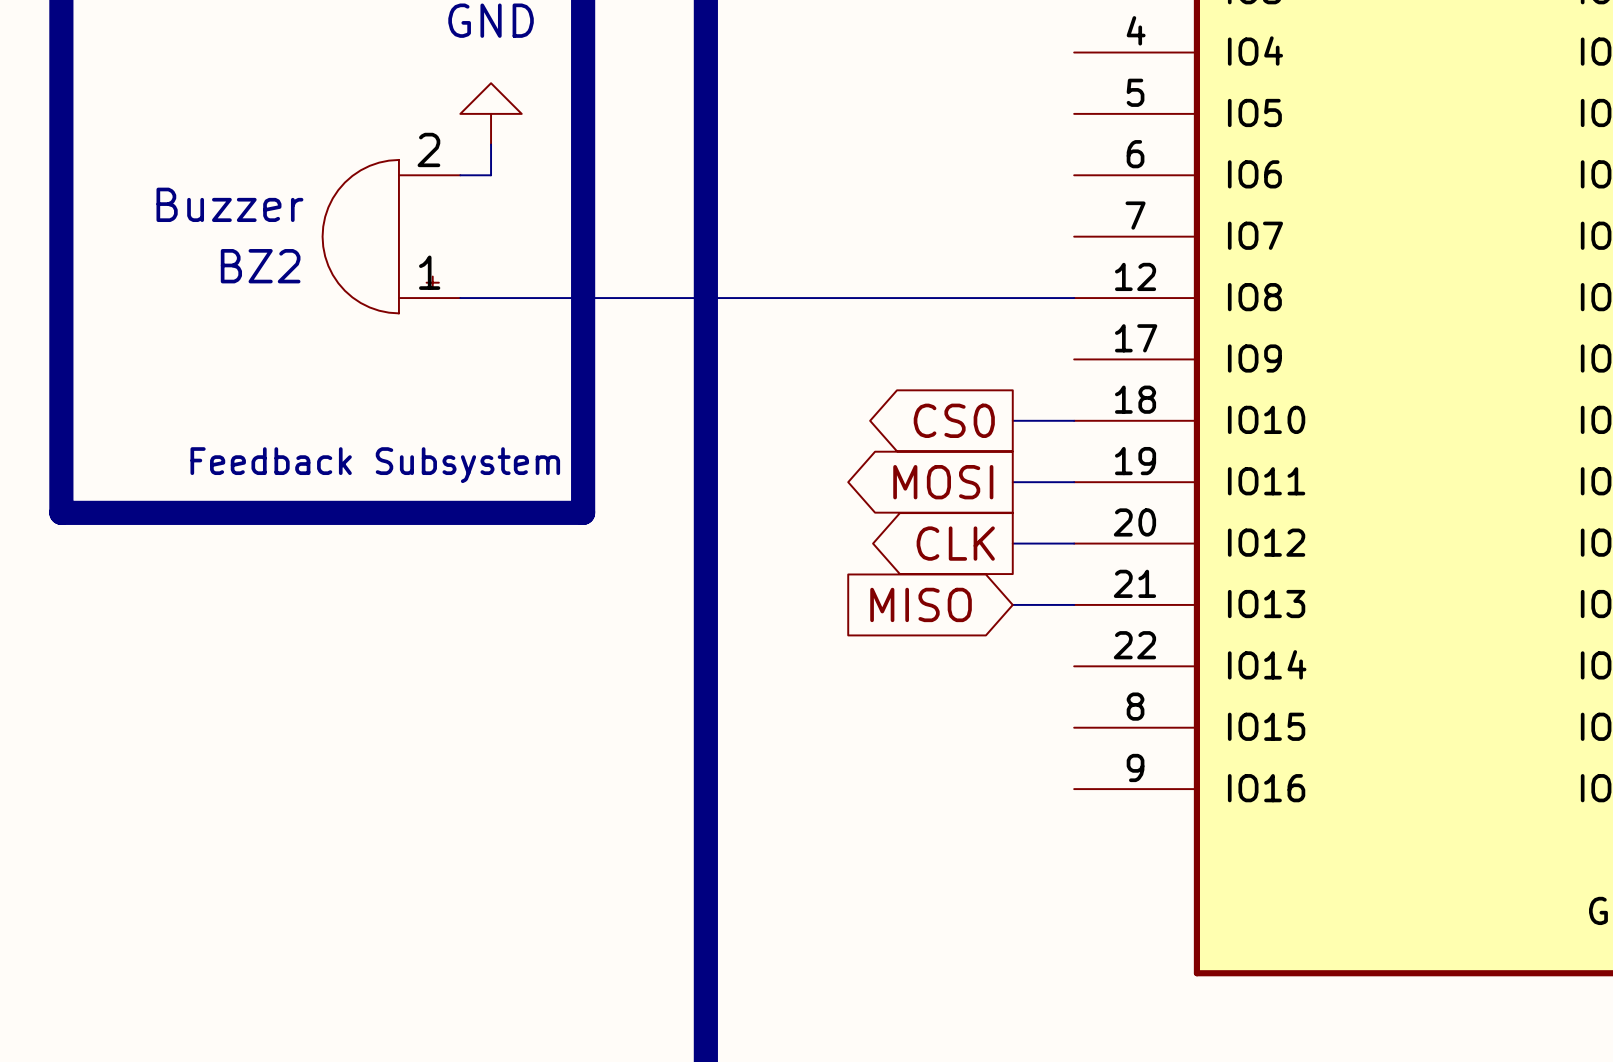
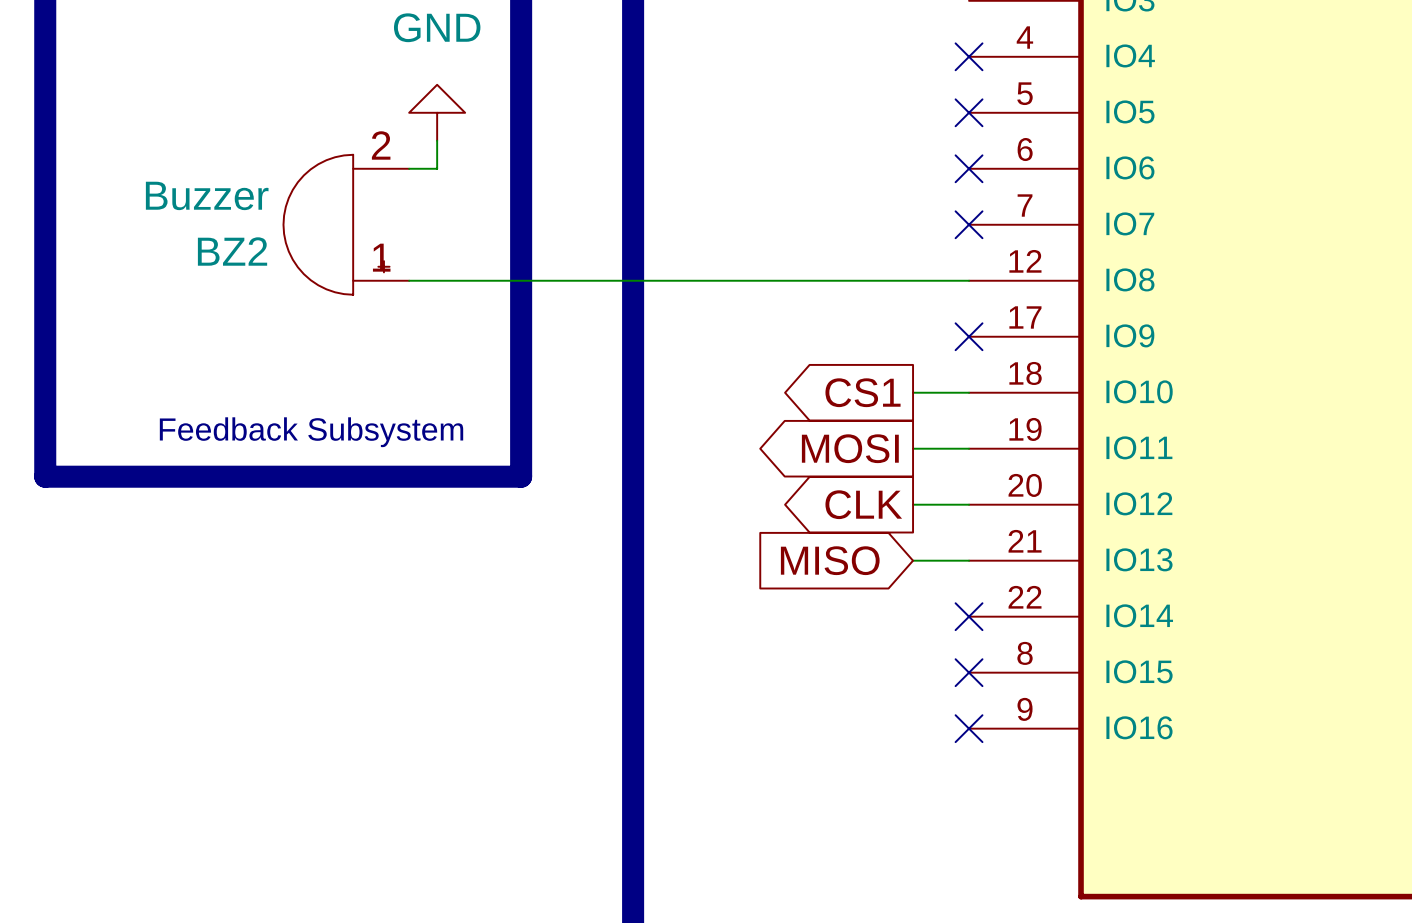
no-connect mark: none -> (969, 56)
no-connect mark: none -> (969, 112)
no-connect mark: none -> (969, 168)
no-connect mark: none -> (969, 224)
no-connect mark: none -> (969, 336)
global label: CS0 (954, 420) -> CS1 (863, 392)
no-connect mark: none -> (969, 616)
no-connect mark: none -> (969, 672)
no-connect mark: none -> (969, 728)

